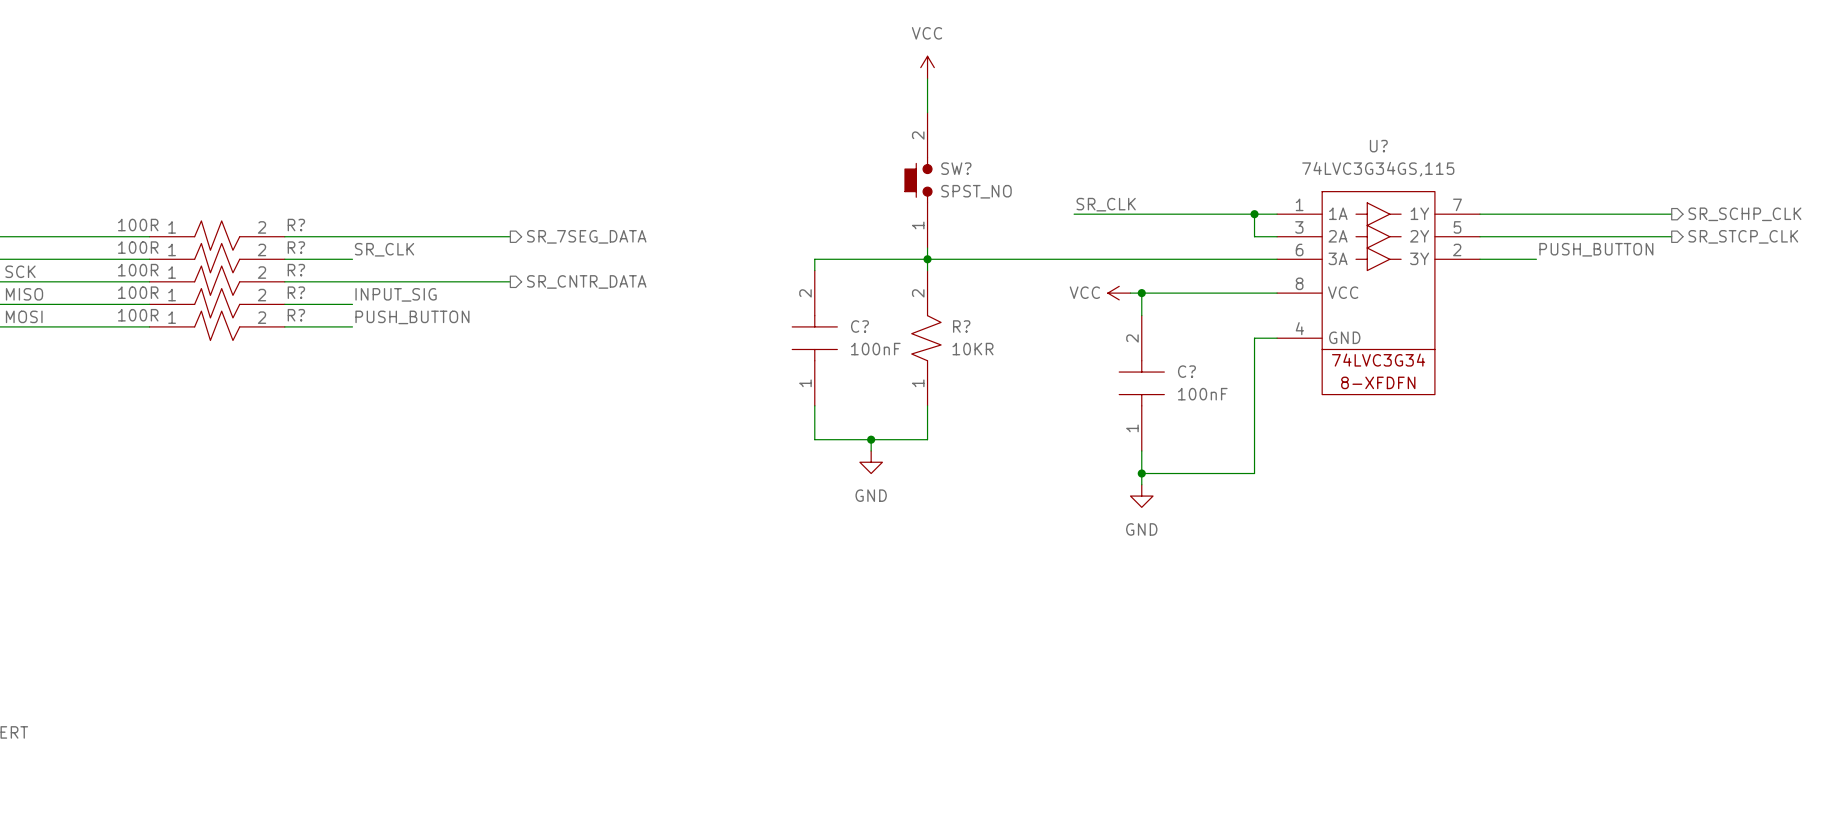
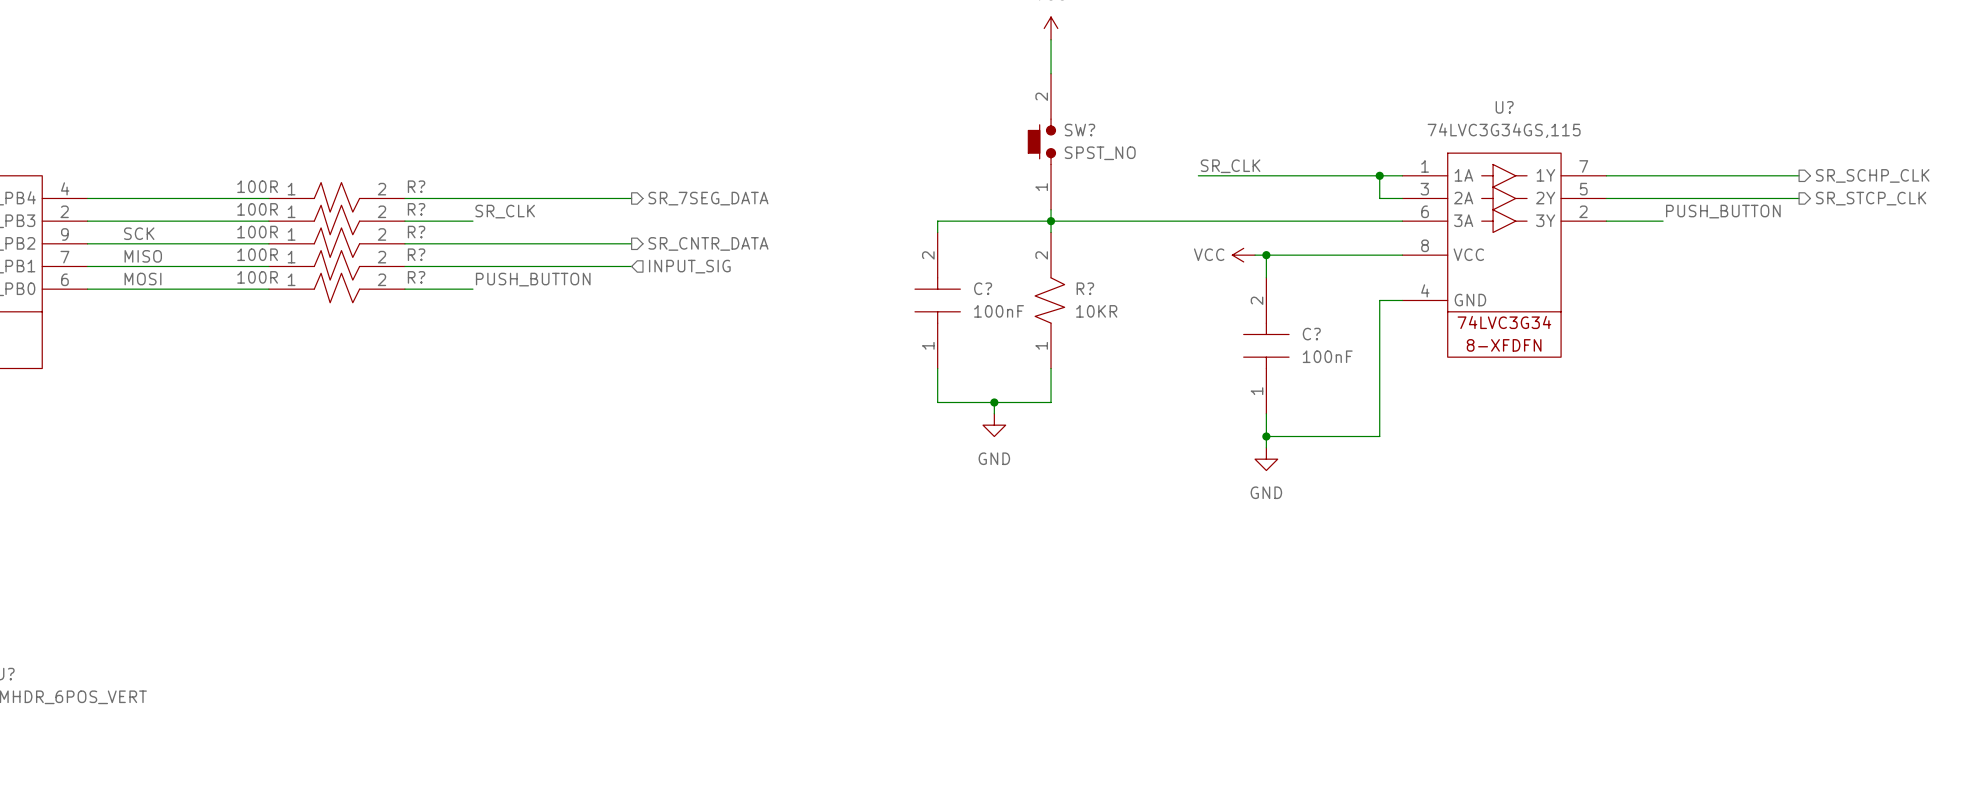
label: INPUT_SIG (396, 294) -> none
wire: none -> (472, 266) (631, 266)
hierarchical label: none -> INPUT_SIG (689, 266)

